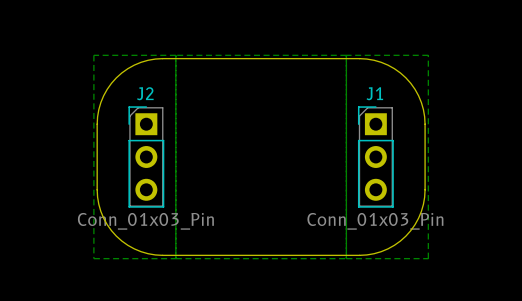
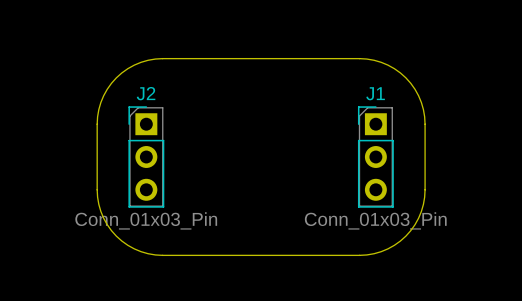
zone outline: (175, 55) (175, 258) -> none
zone outline: (346, 55) (346, 258) -> none
zone outline: (428, 55) (93, 55) (93, 258) (428, 258) (428, 55) -> none

